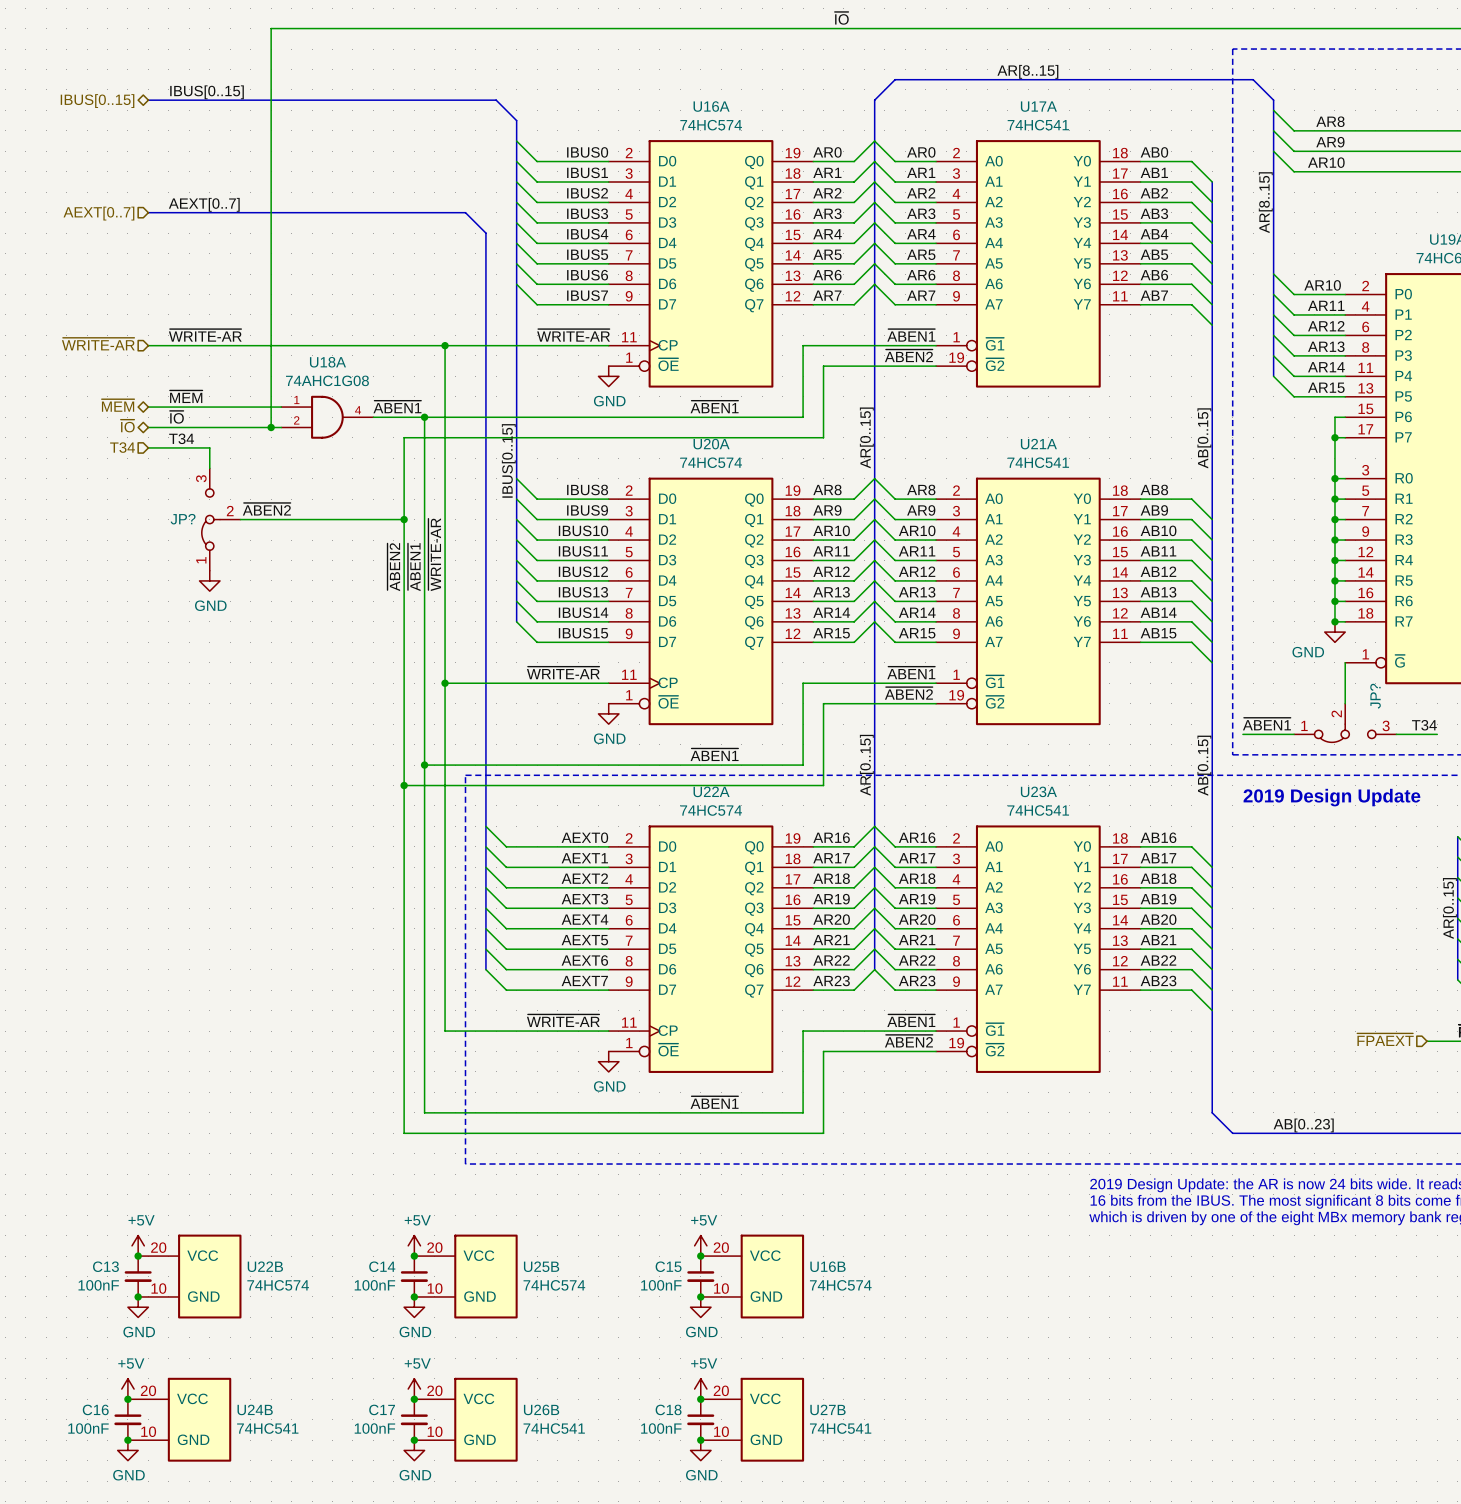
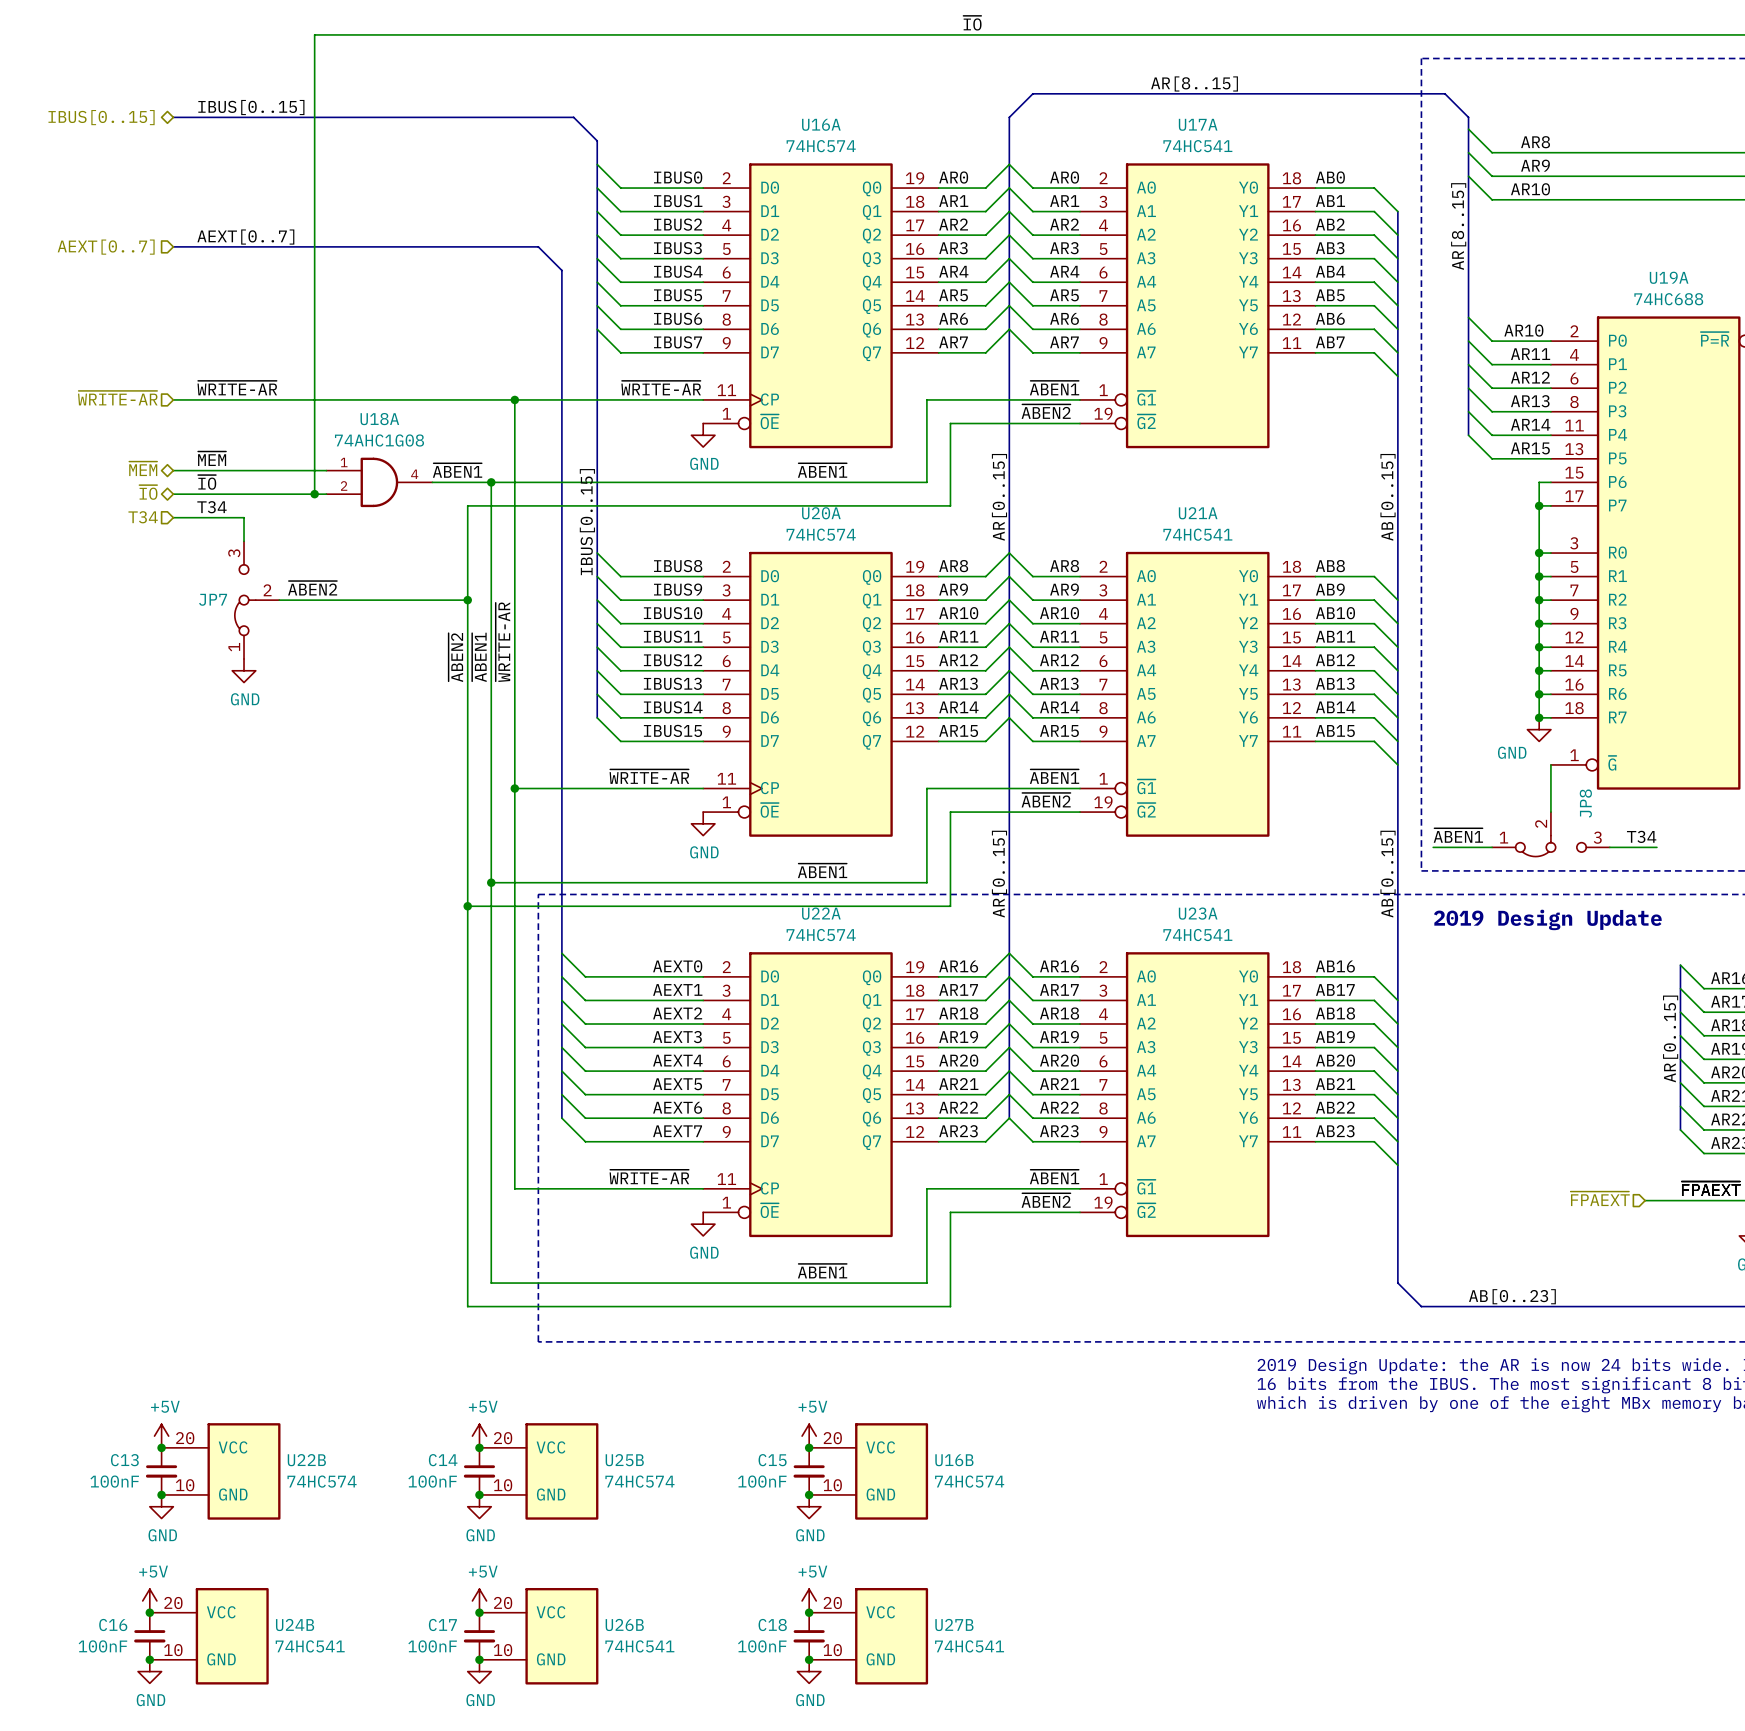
JP? name: JP? (183, 519) -> JP7 (213, 599)
JP? name: JP? (1375, 696) -> JP8 (1585, 803)

